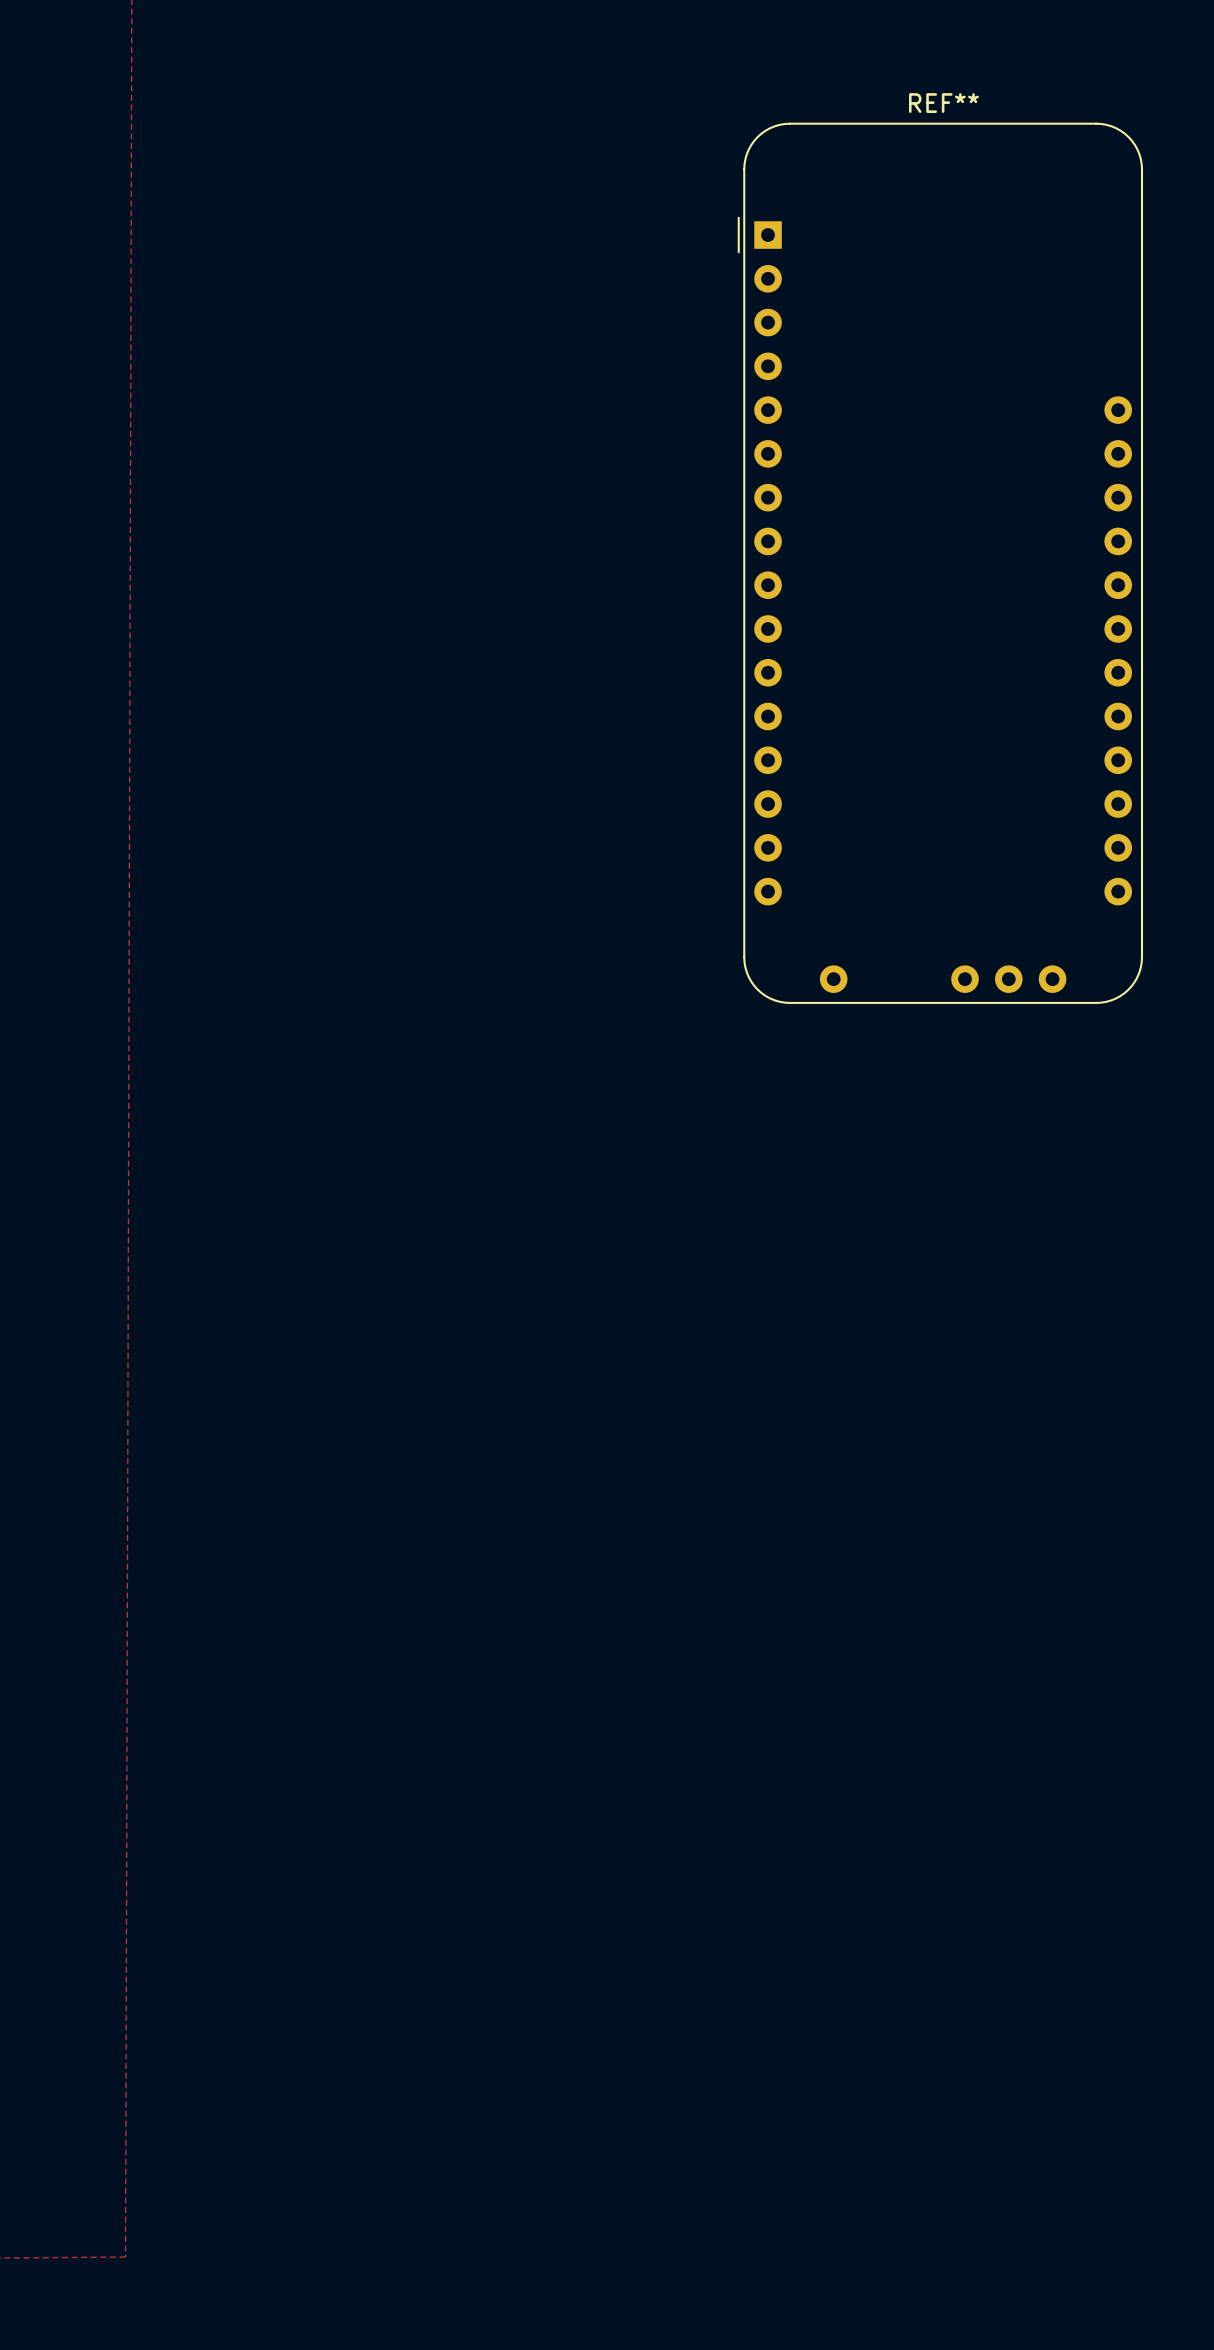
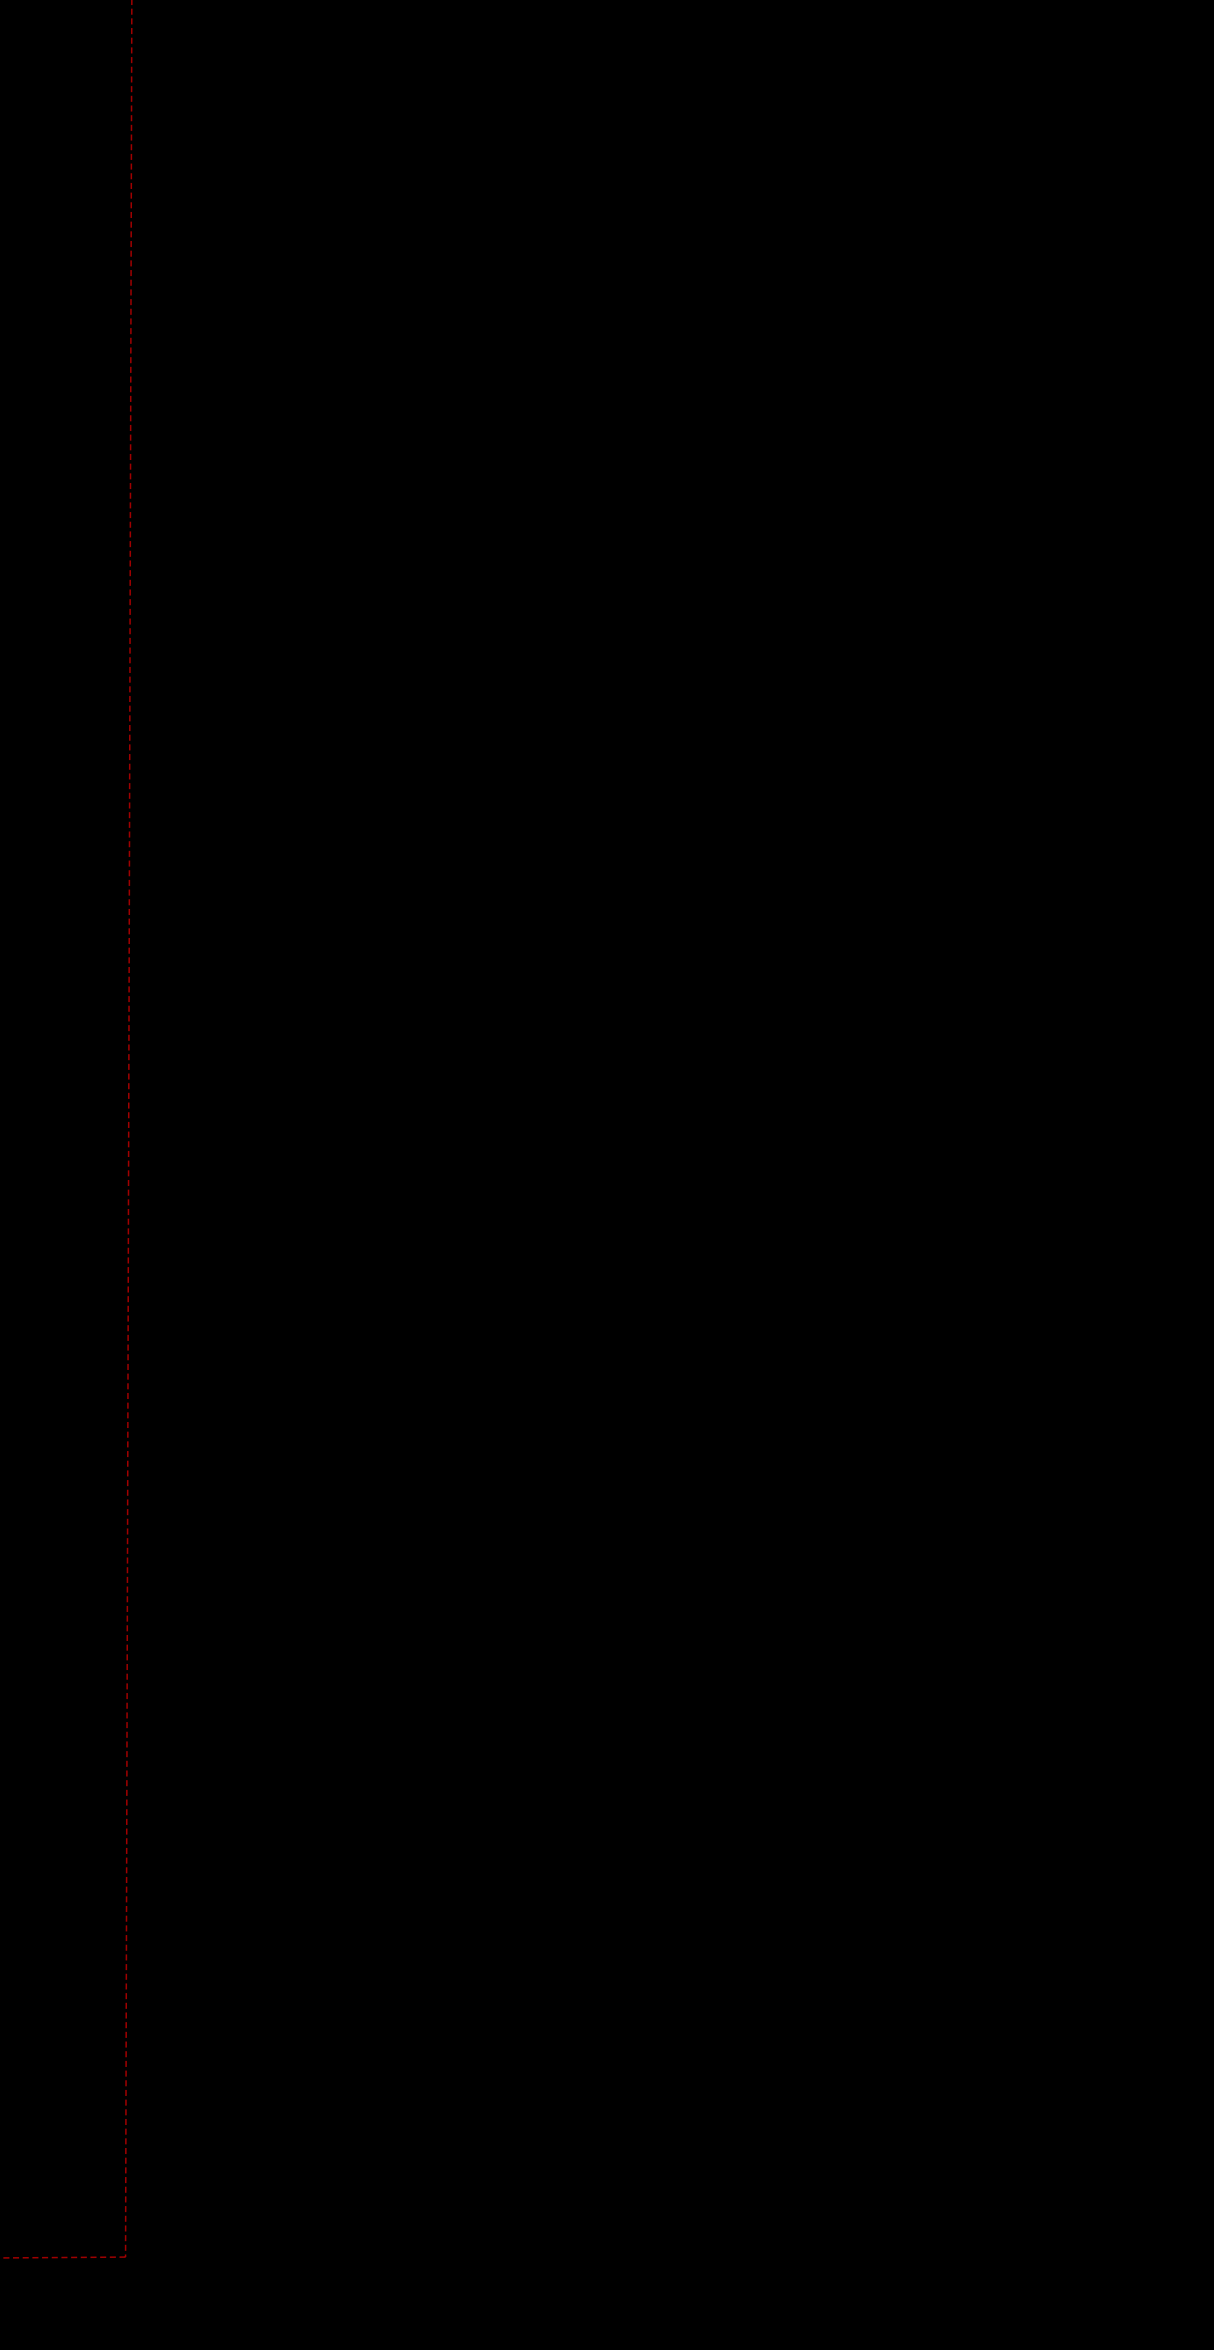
REF**: (940, 563) -> none

